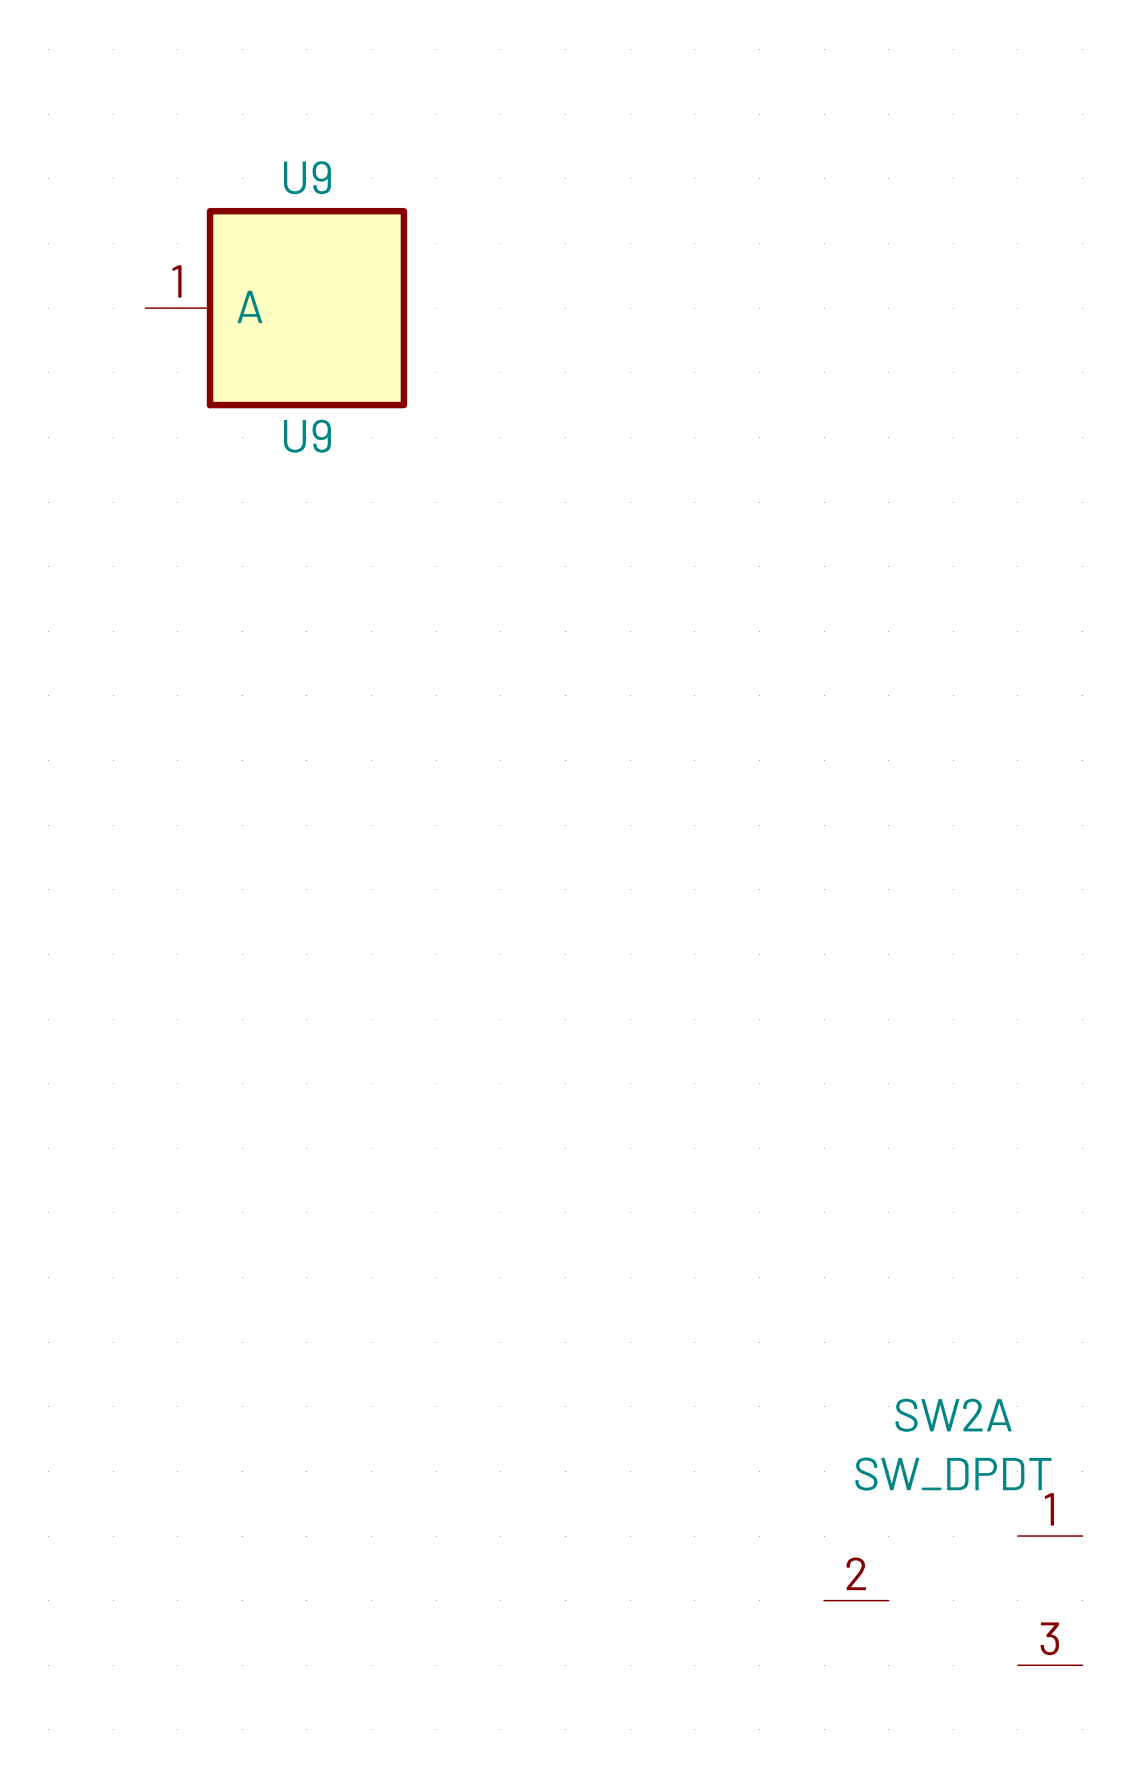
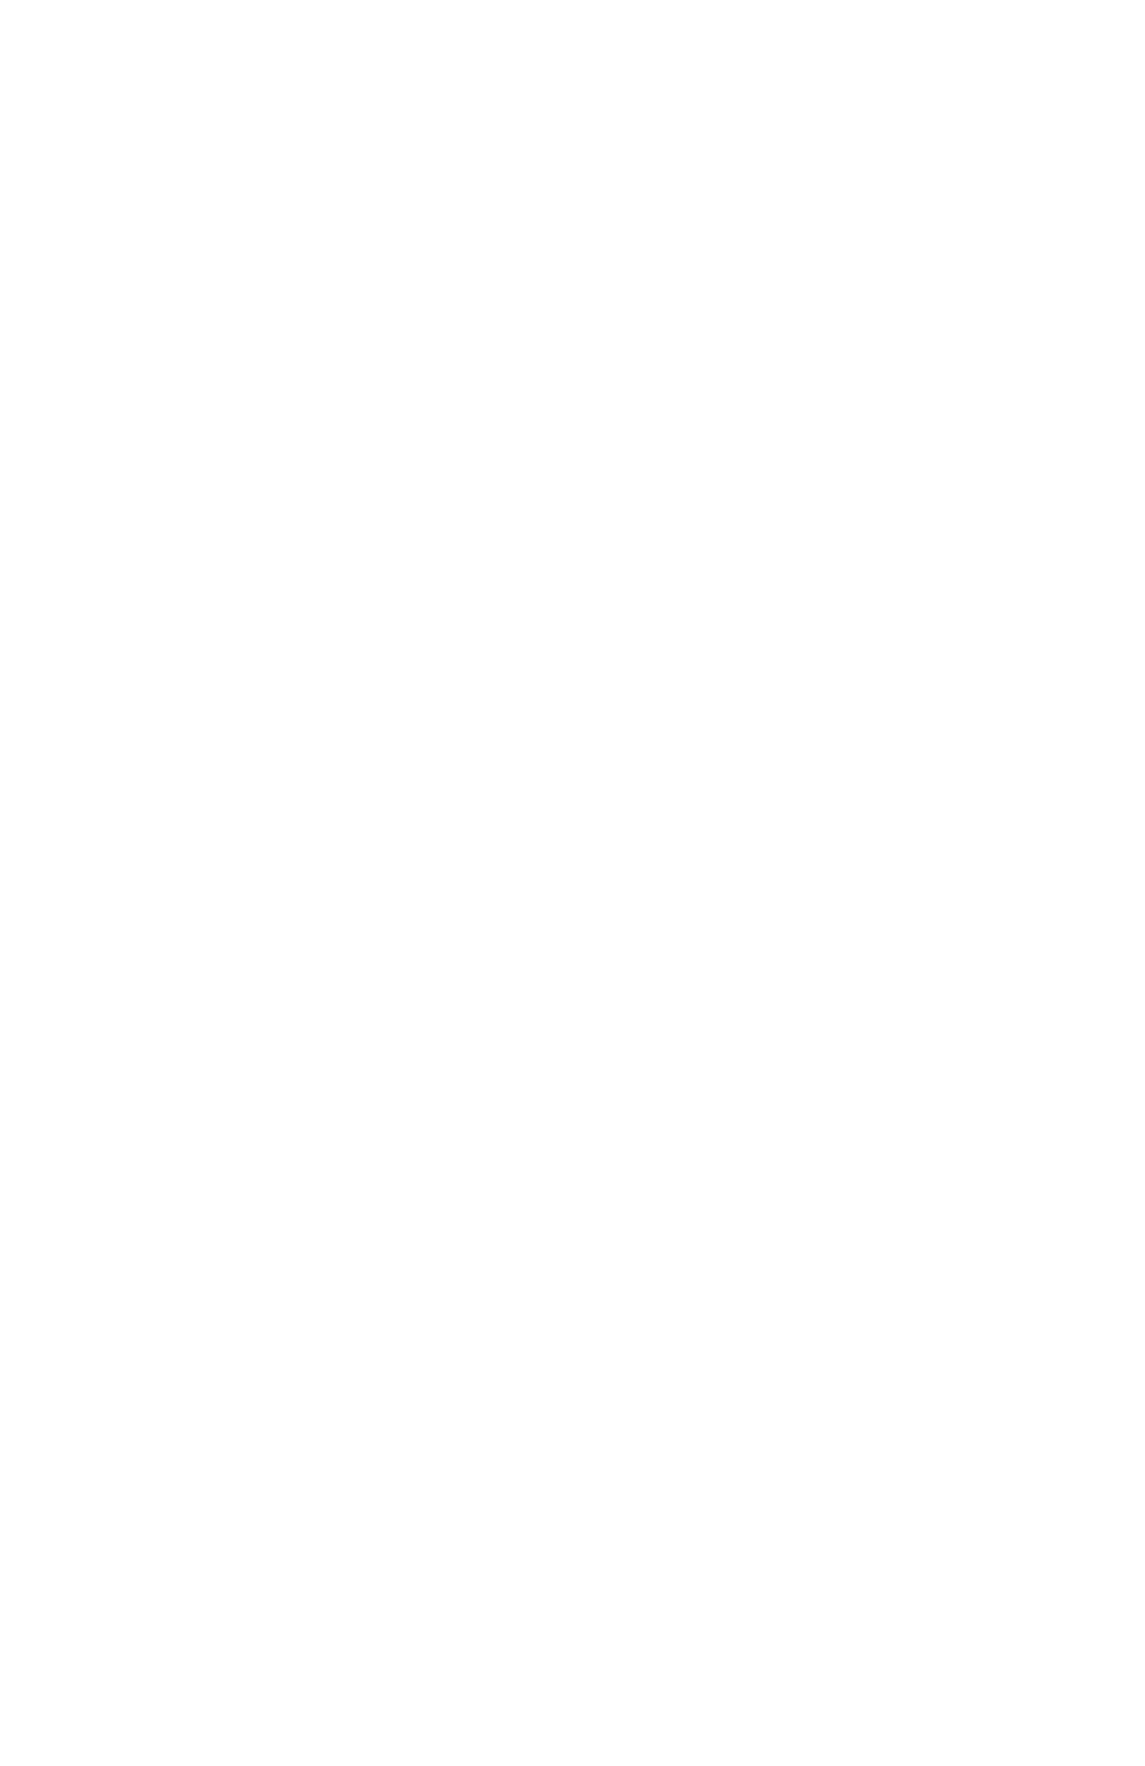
U9: U9 (276, 308) -> none
SW2A: SW_DPDT (953, 1600) -> none

